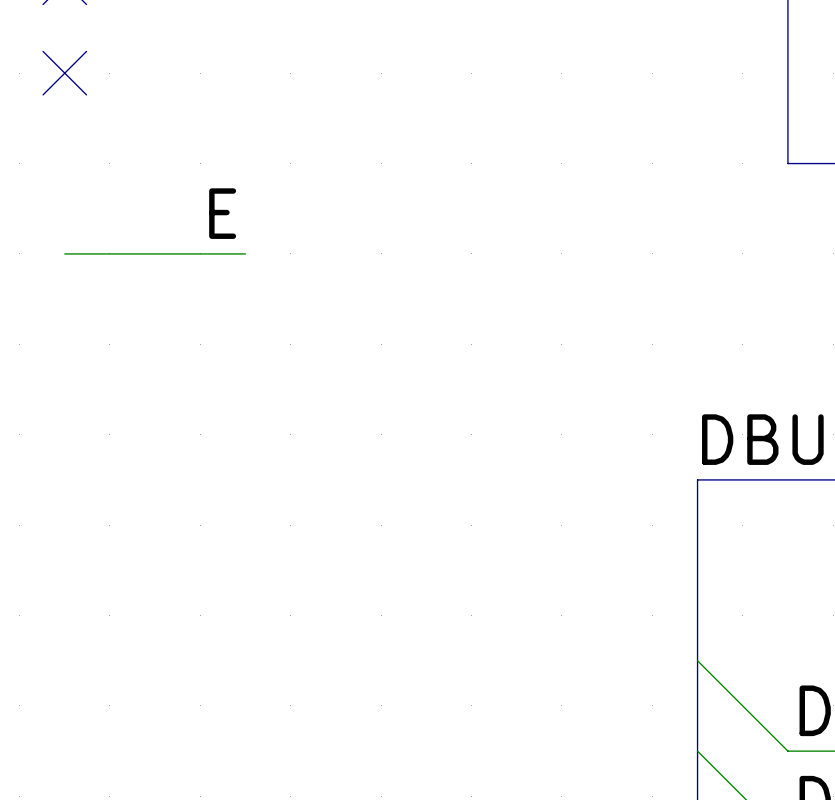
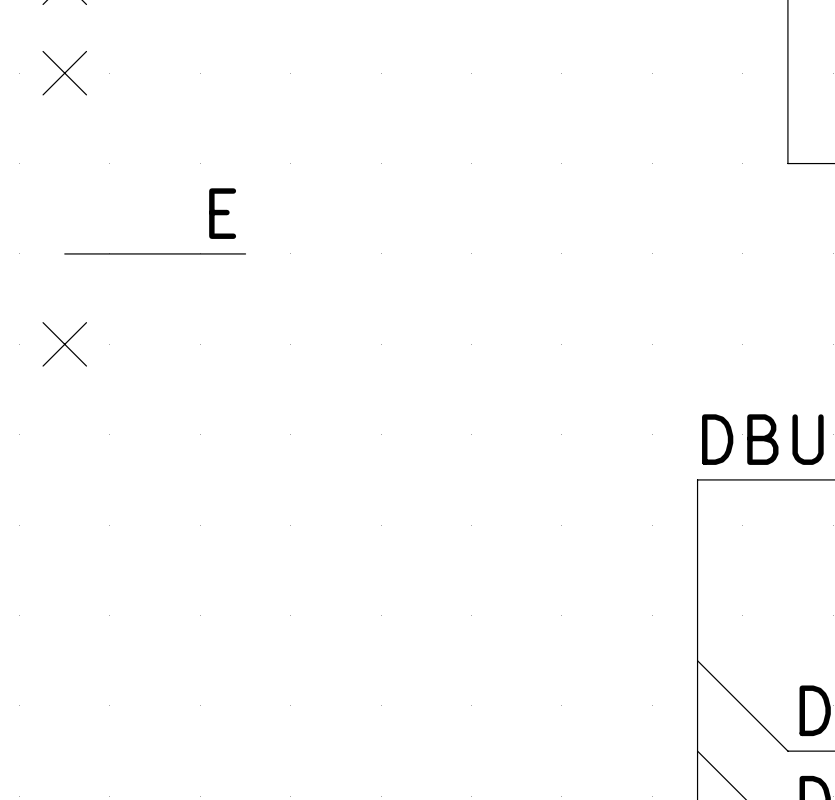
no-connect mark: none -> (64, 344)

